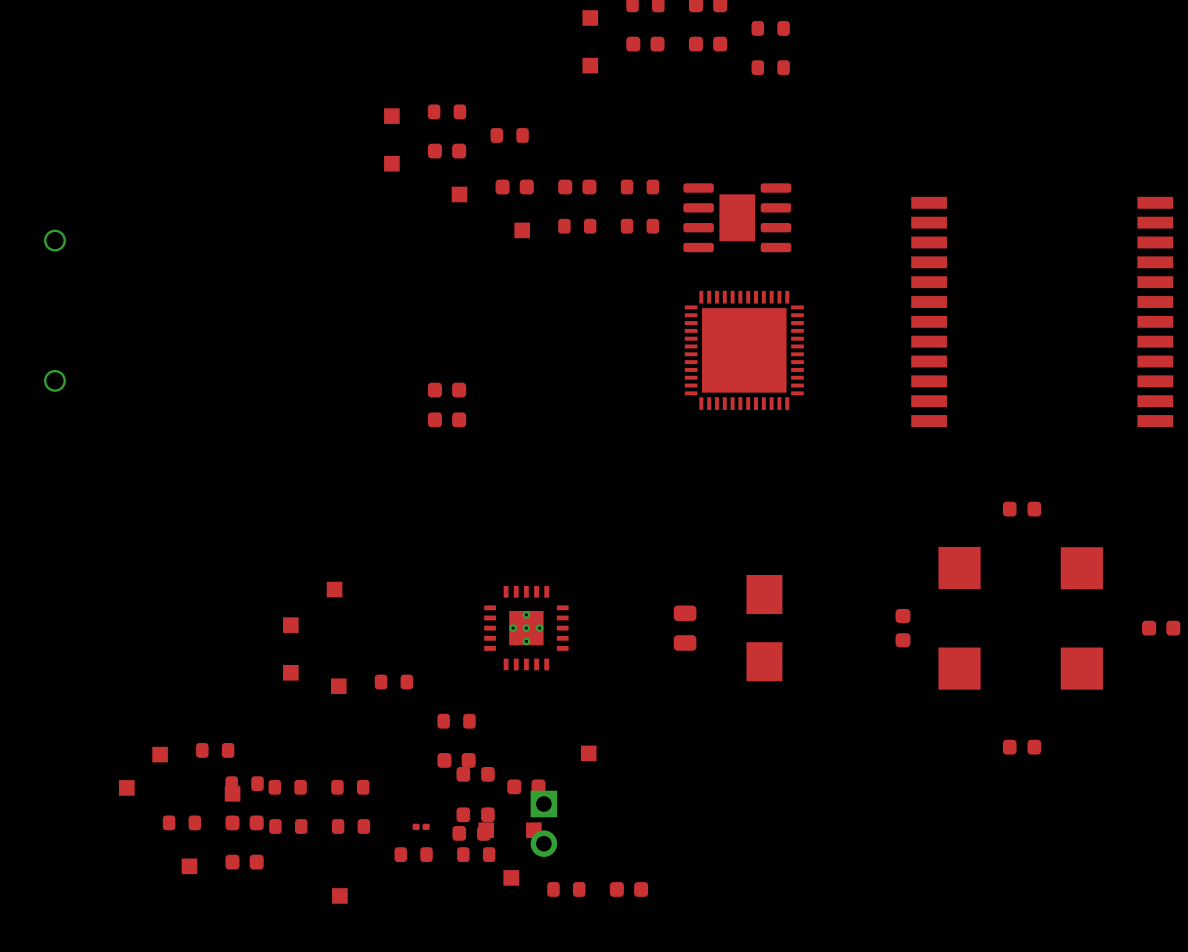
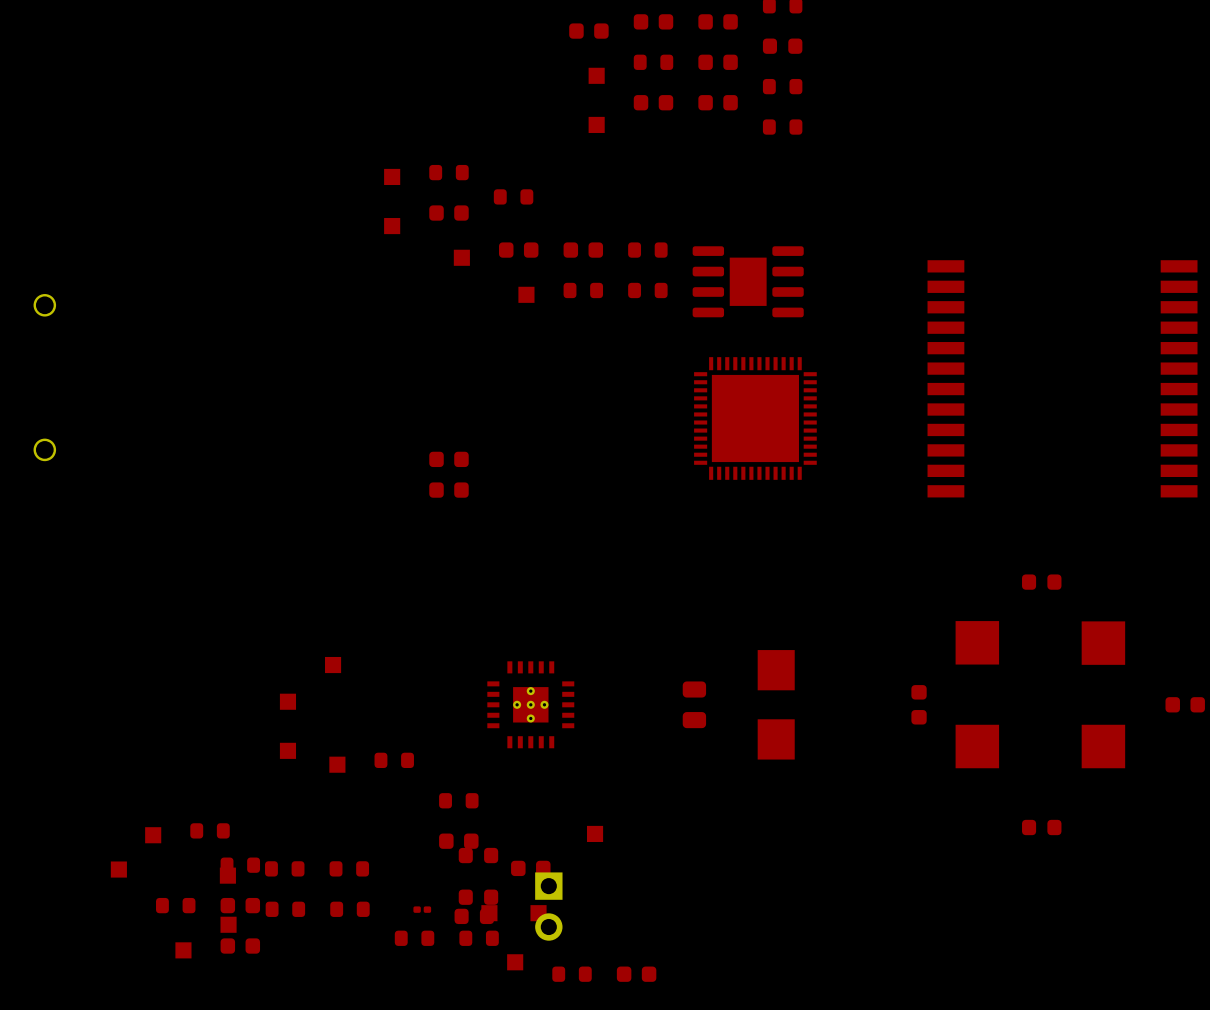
part position: (339, 895) -> (228, 924)

